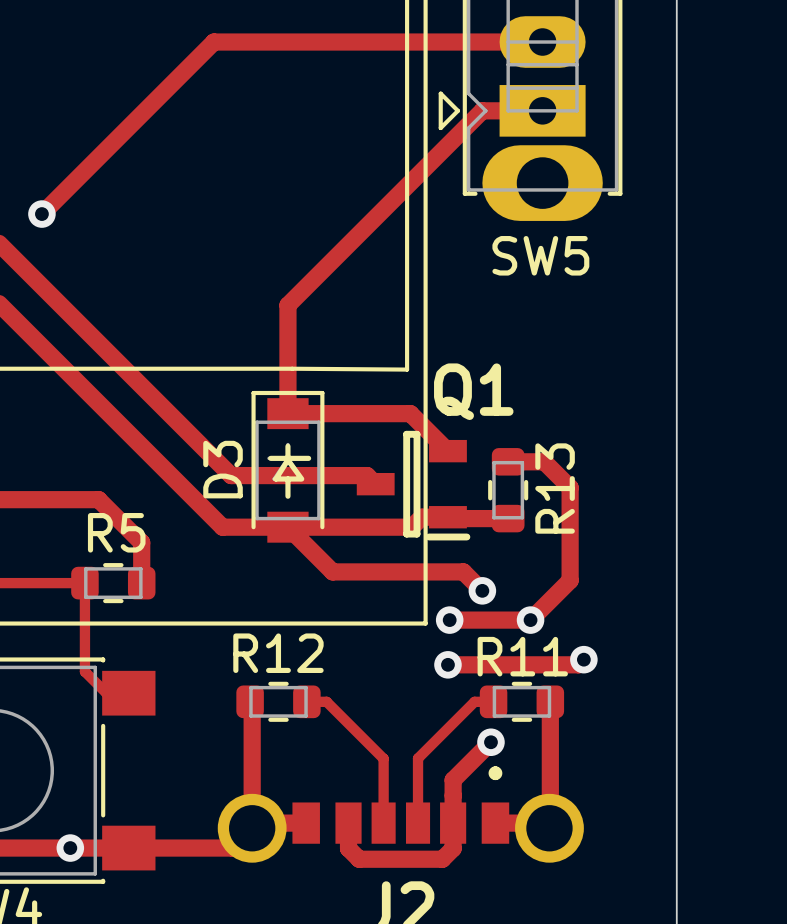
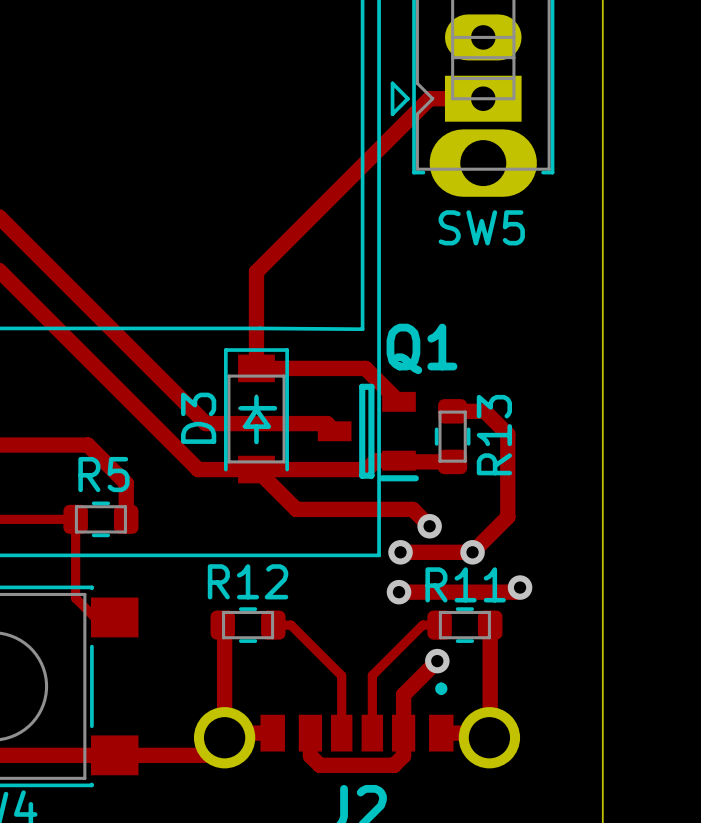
track: (542, 42) (213, 42) (41, 214) -> none
via: (41, 214) -> none
via: (70, 848) -> none

